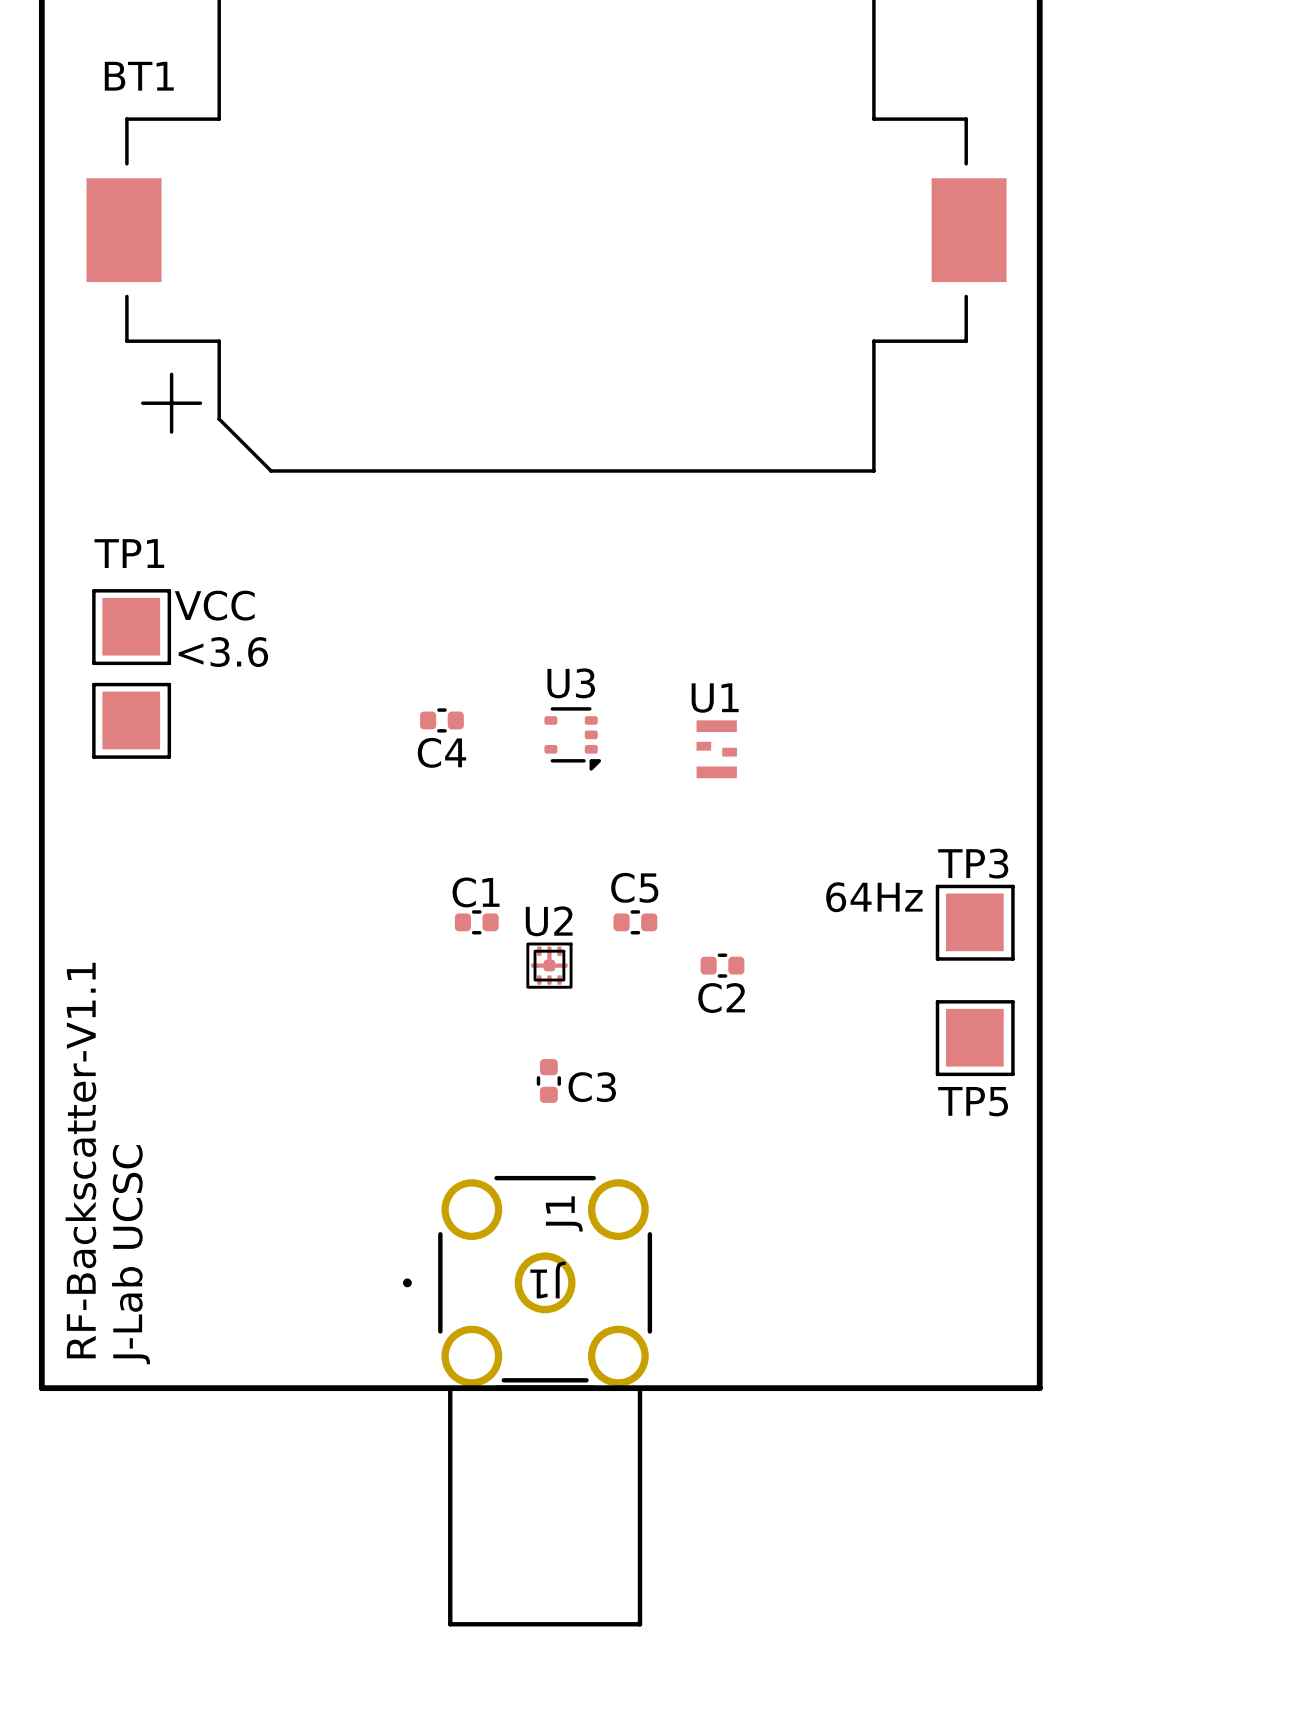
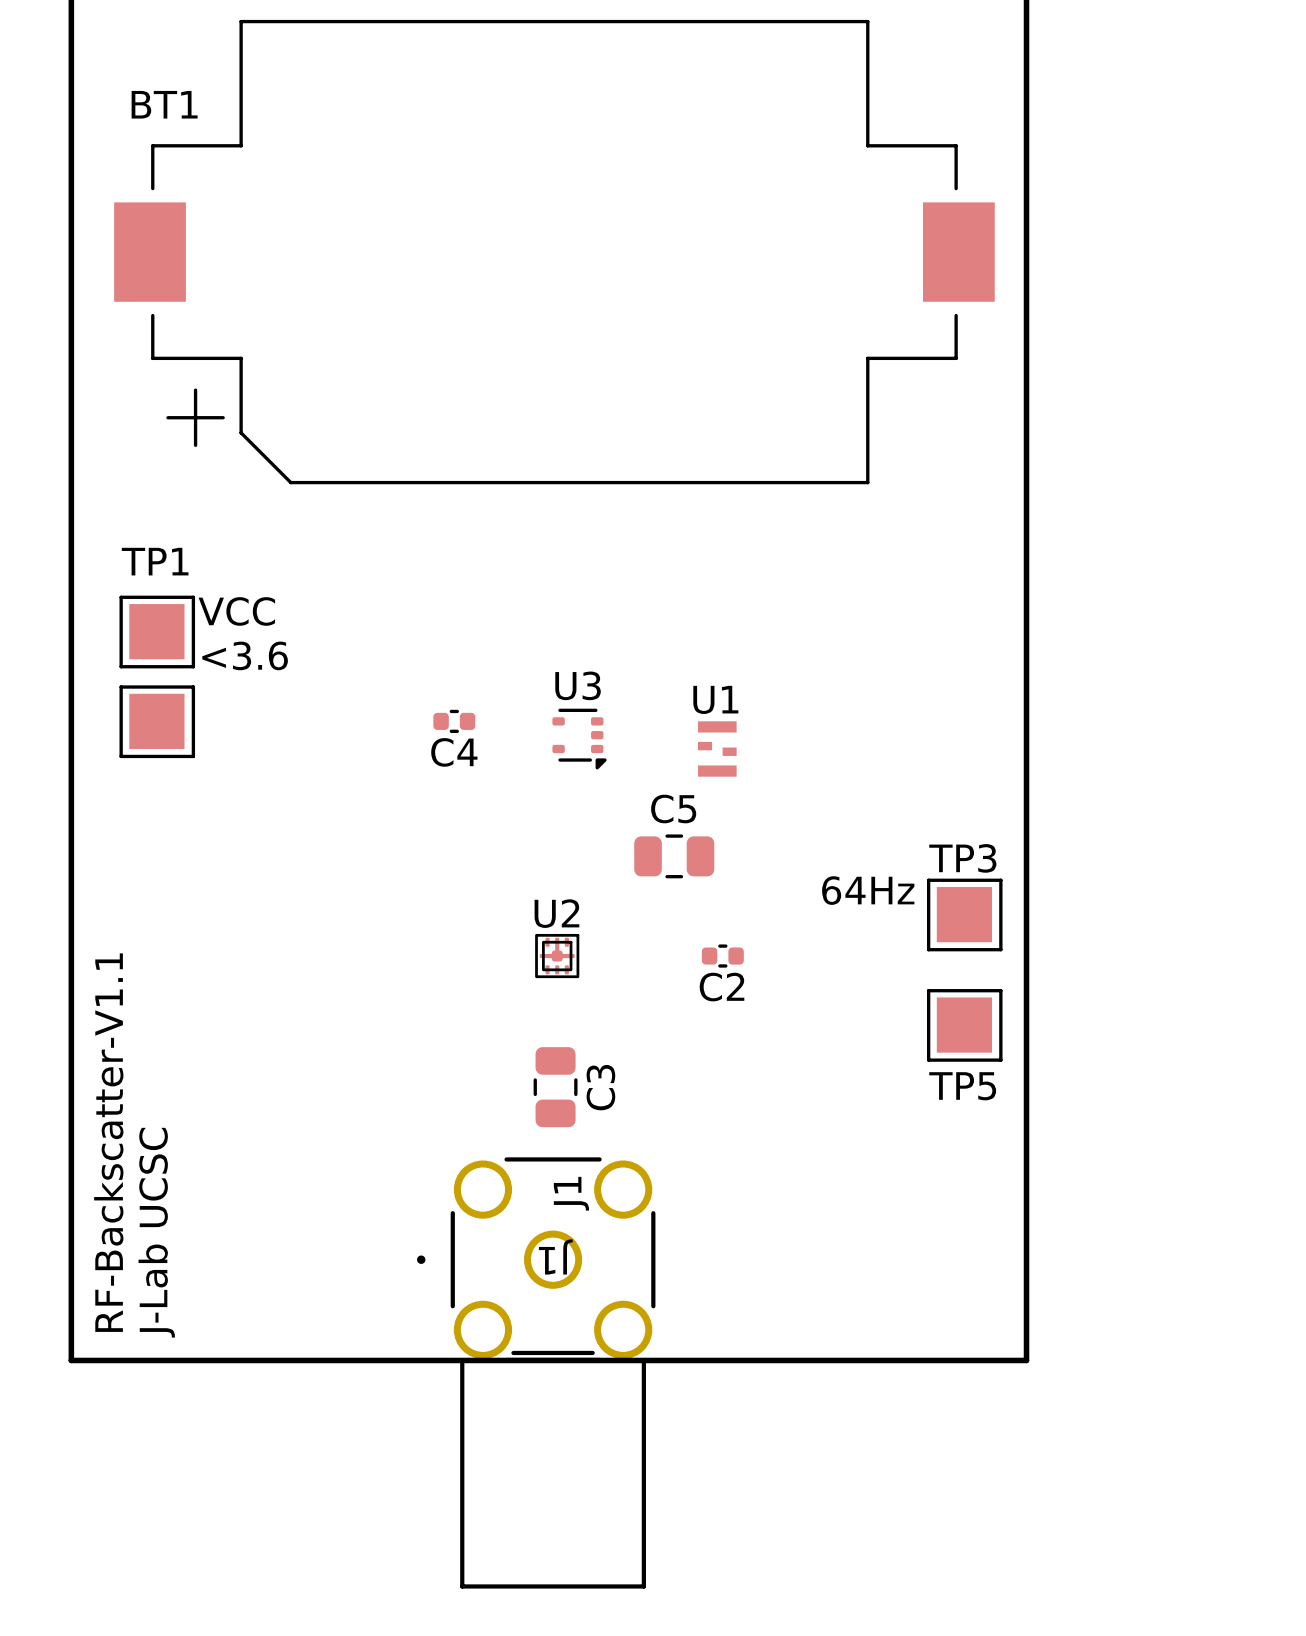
C5 footprint: [613, 910, 658, 935] -> [634, 834, 715, 879]
C1: (476, 922) -> none
C3 footprint: [536, 1059, 561, 1103] -> [533, 1047, 578, 1128]

